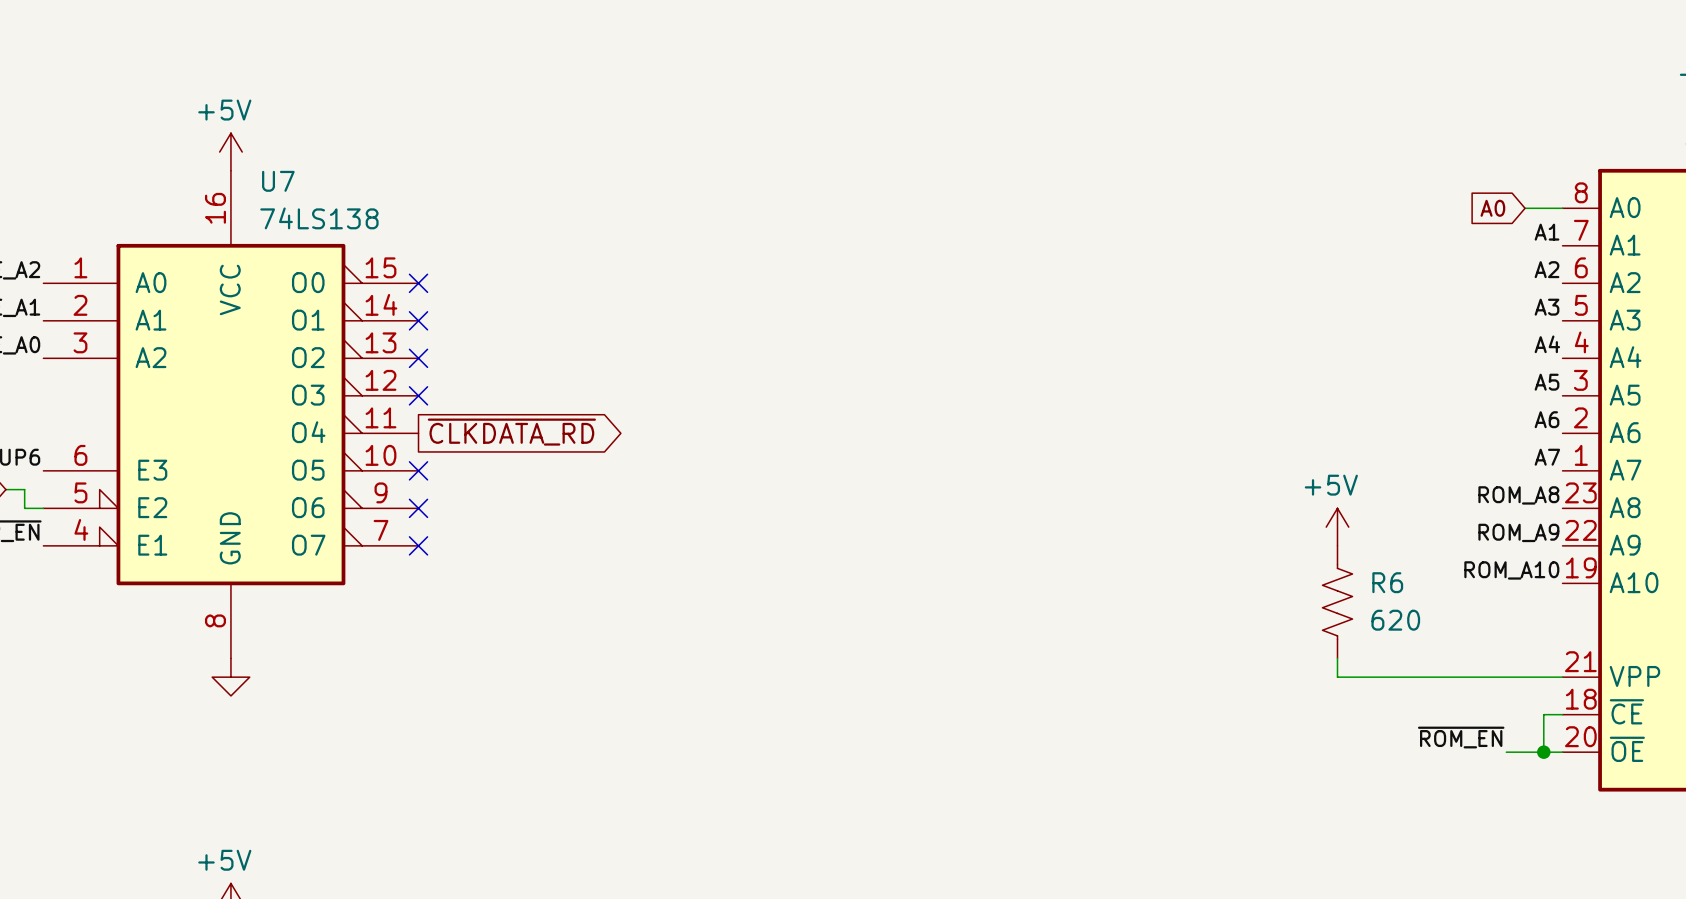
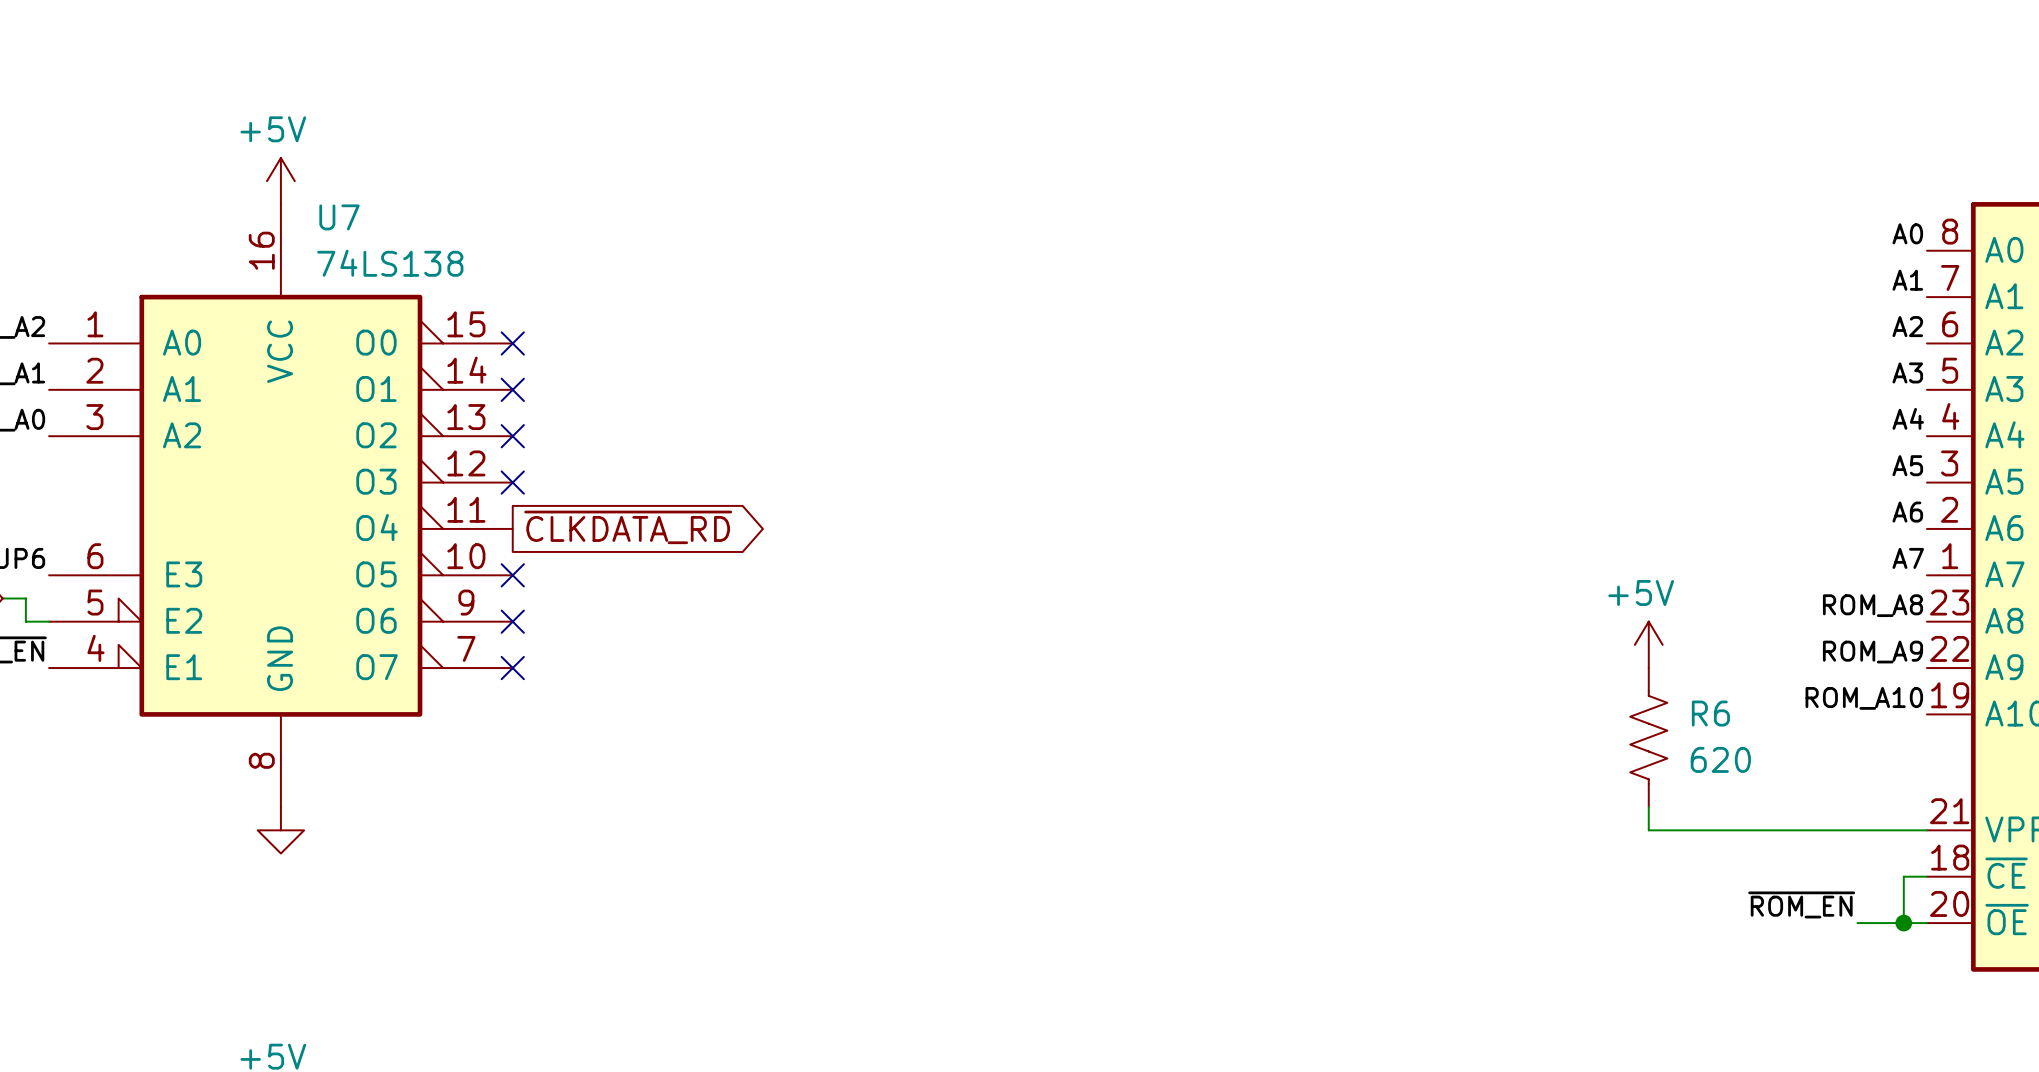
label: none -> A0 (1907, 233)
global label: A0 (1492, 208) -> none
wire: (1525, 208) (1562, 208) -> none

